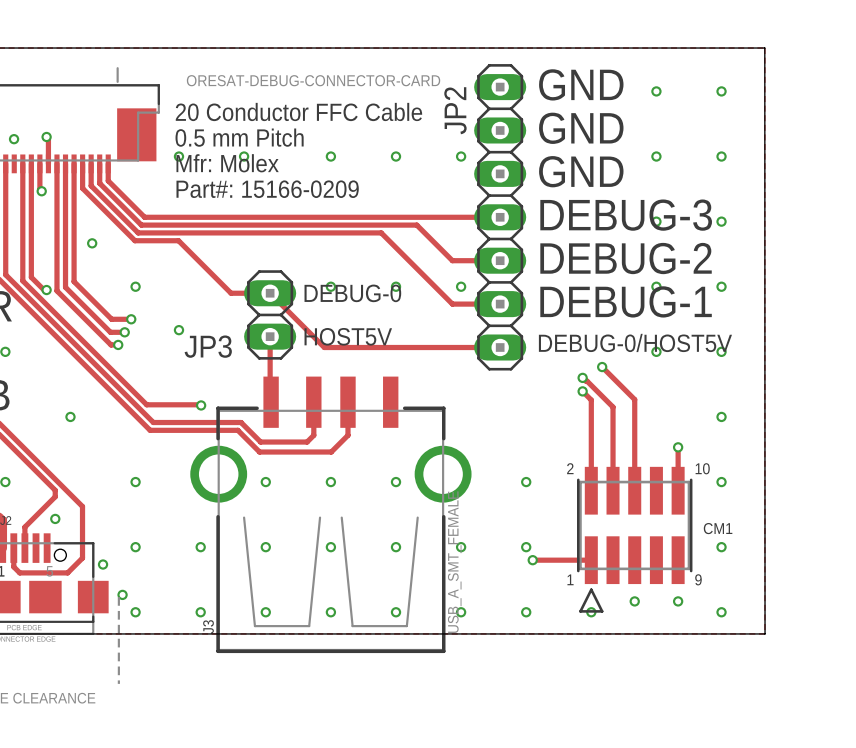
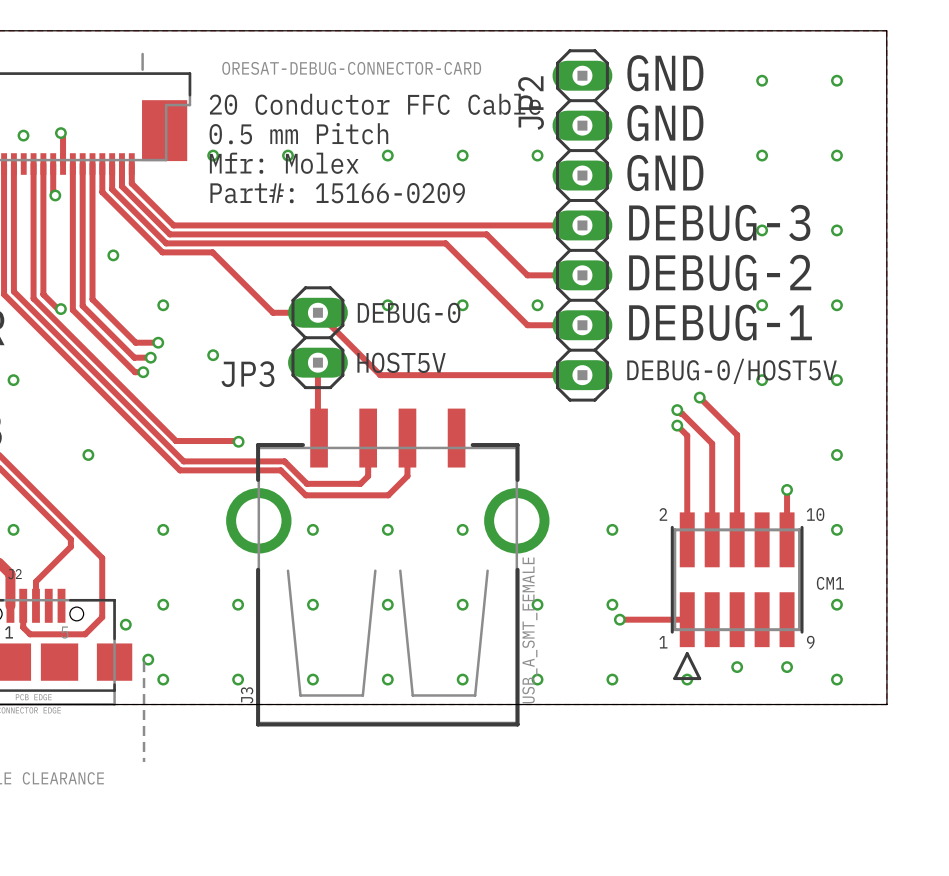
via: (55, 518) -> none

